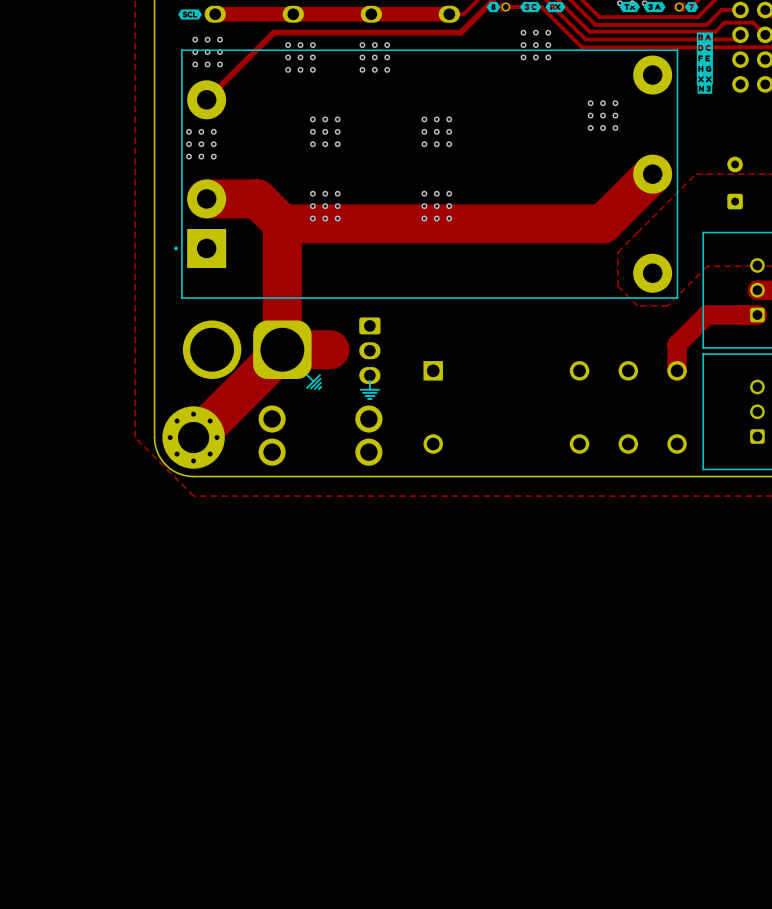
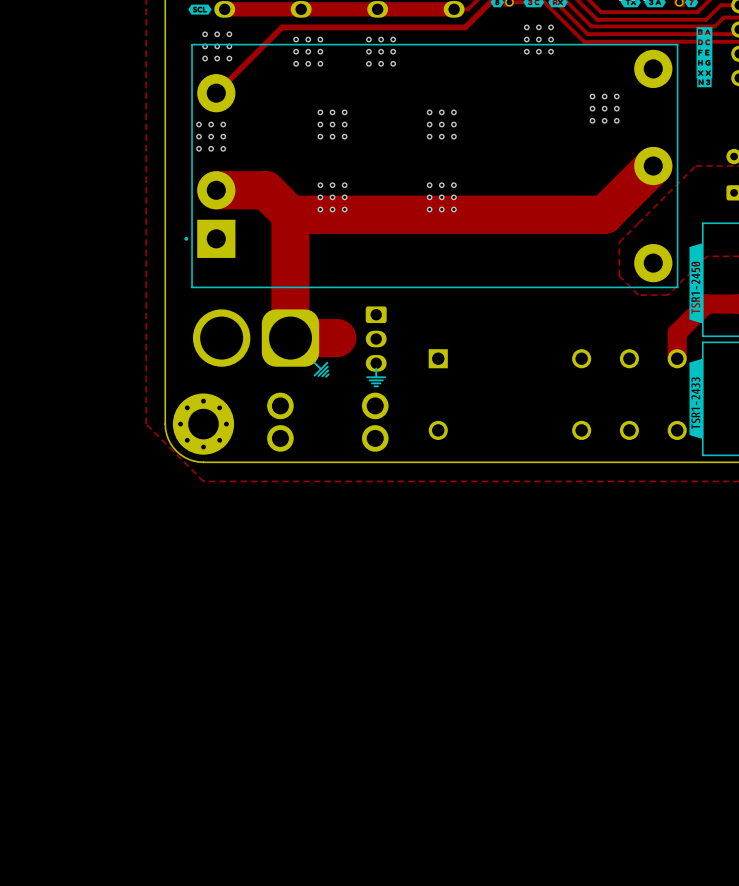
drawing: none -> [689, 243, 703, 324]
track: (282, 351) (196, 437) -> none
drawing: none -> [689, 358, 703, 439]

